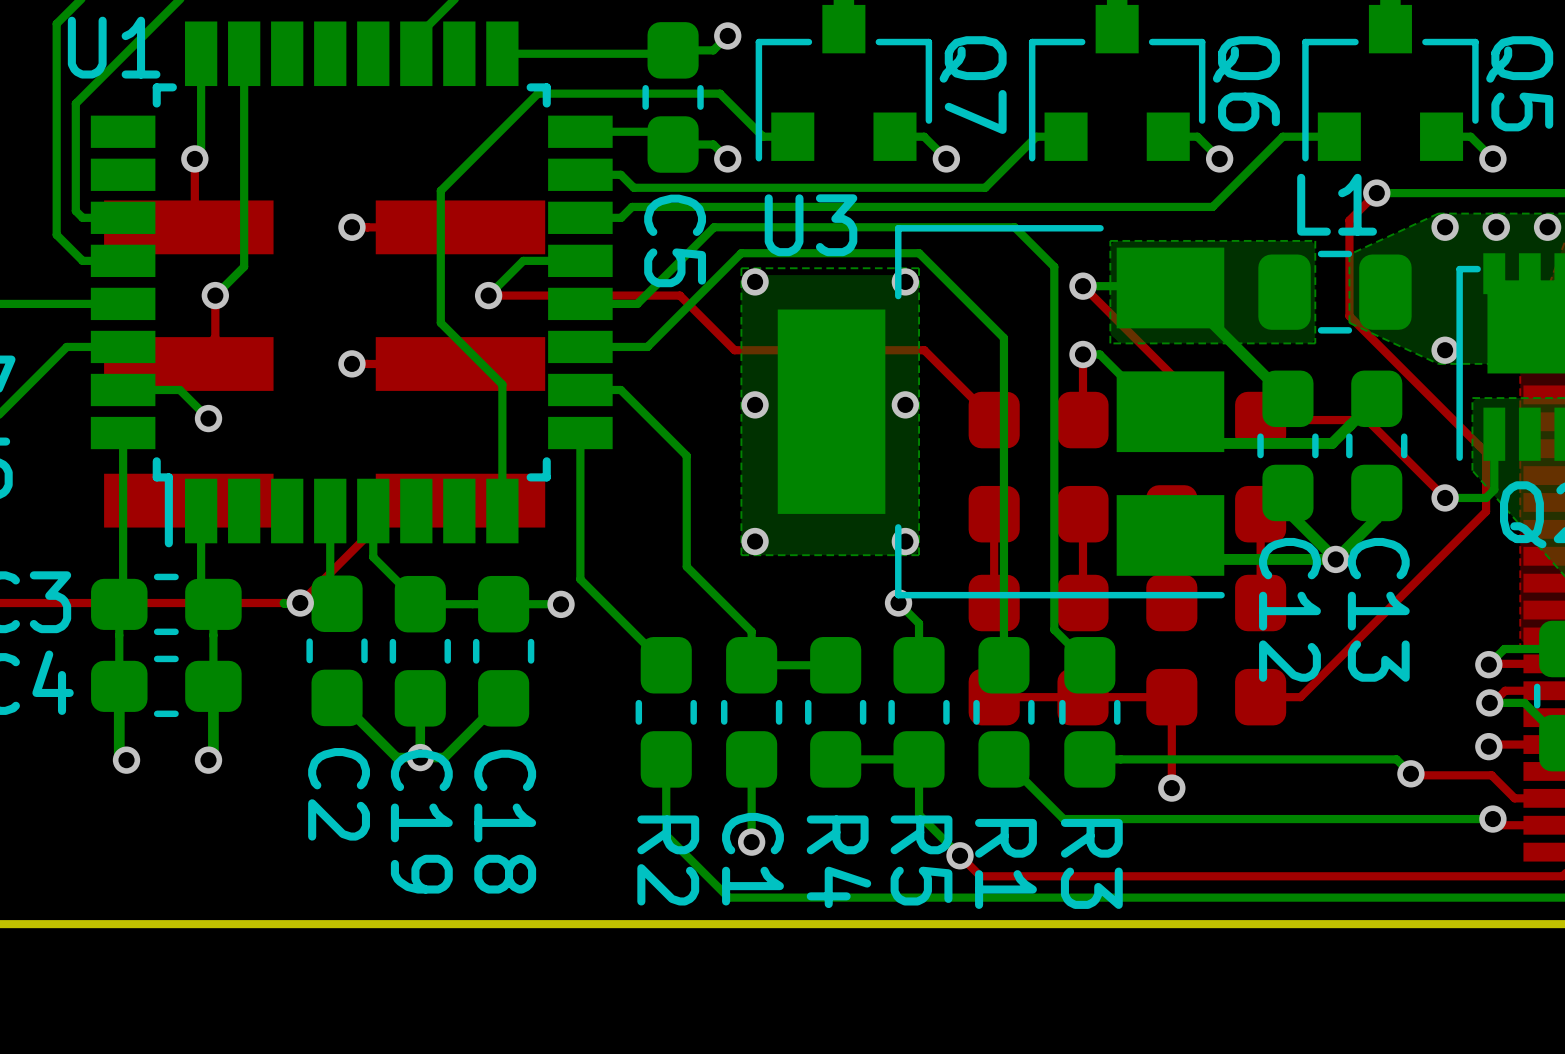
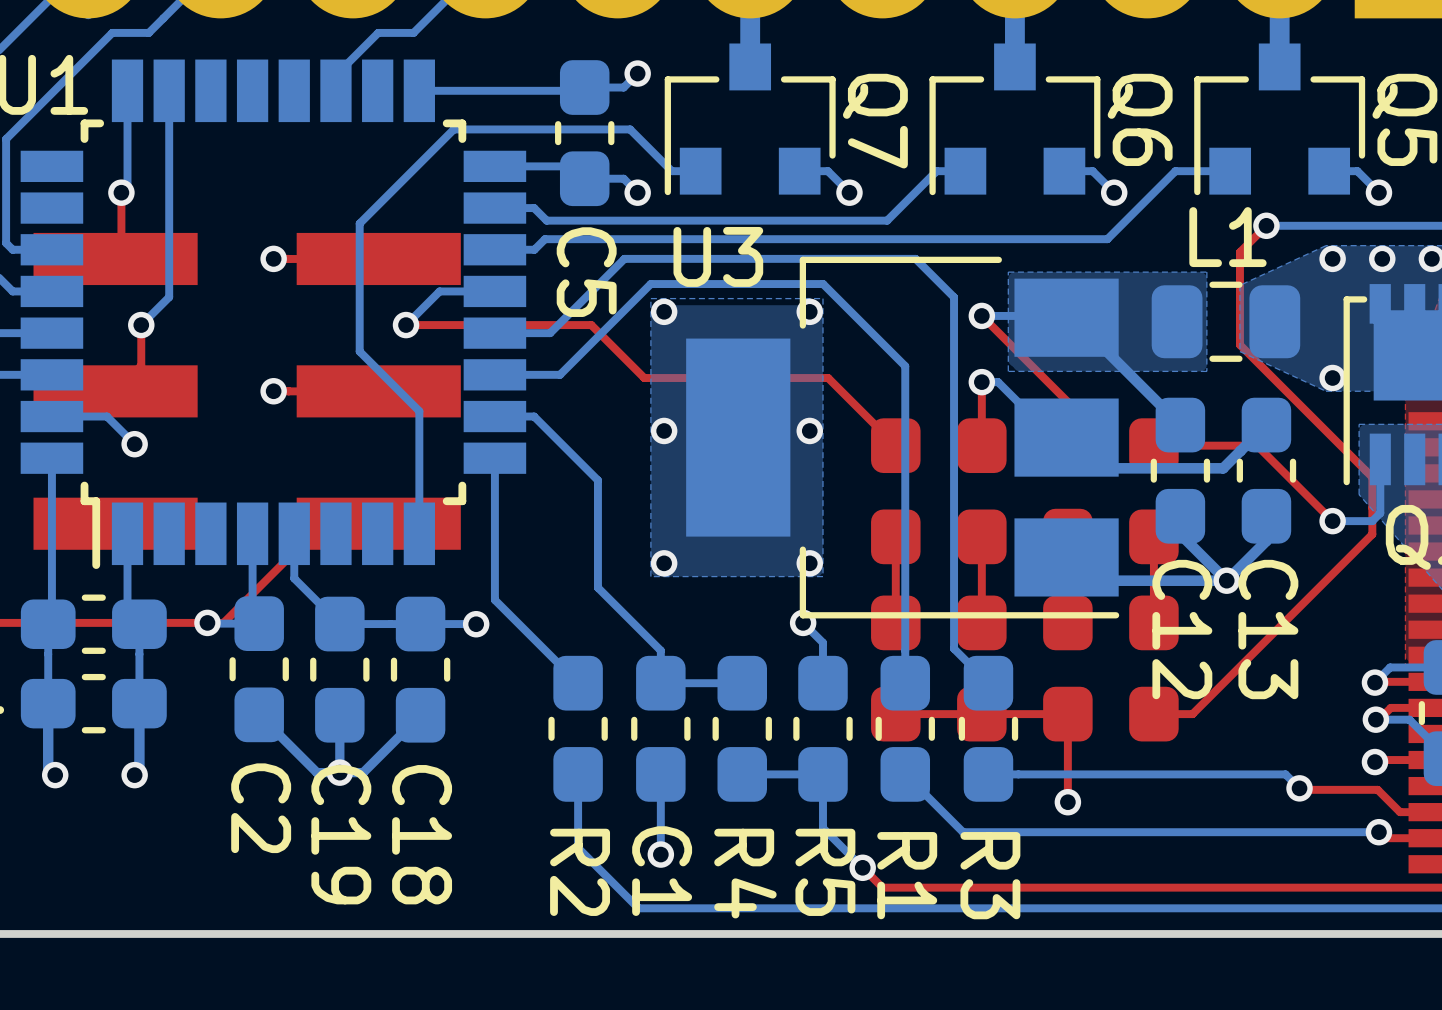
via position: (300, 603) -> (207, 622)

